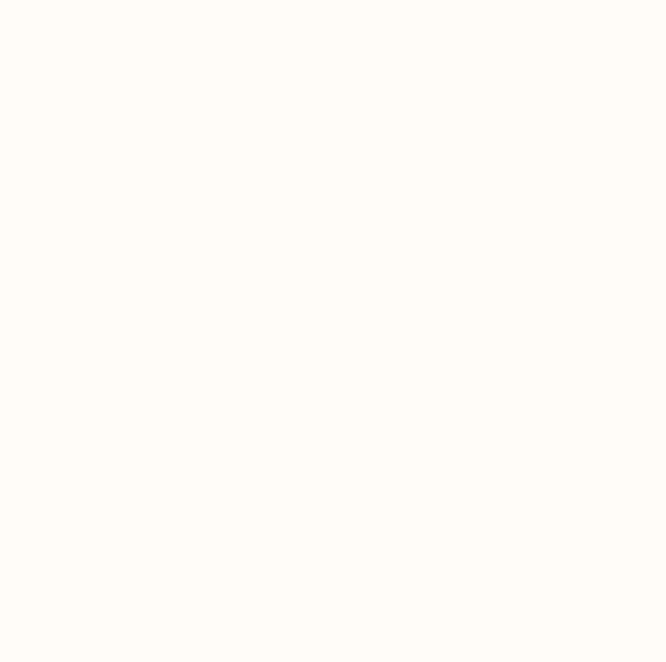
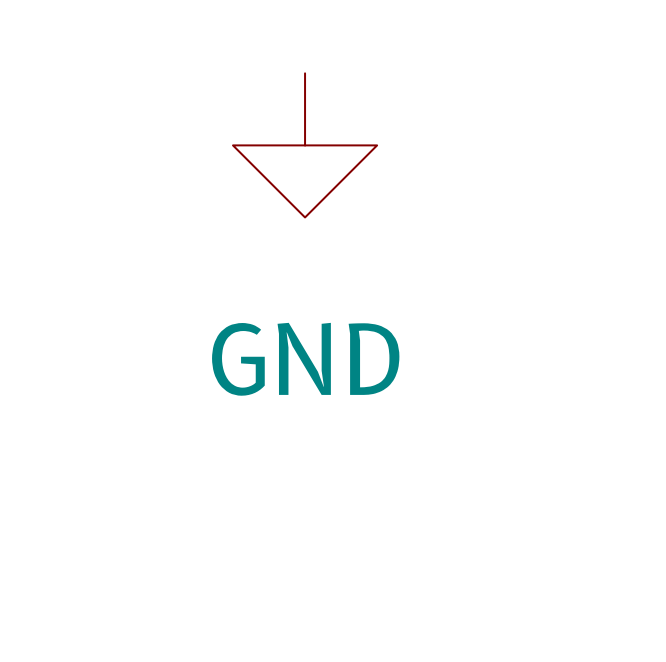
power symbol: none -> GND (305, 145)

